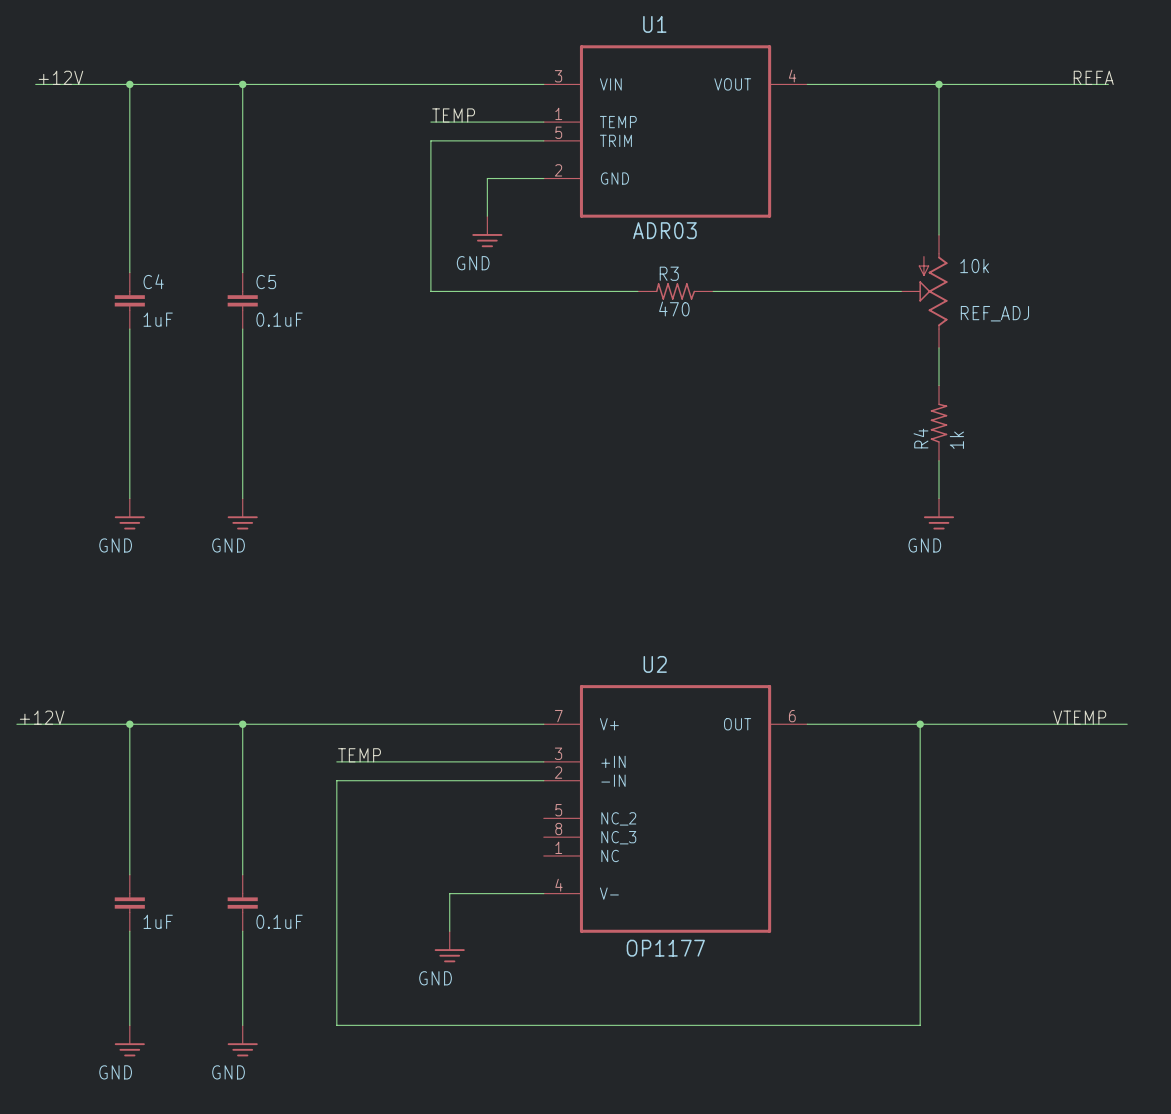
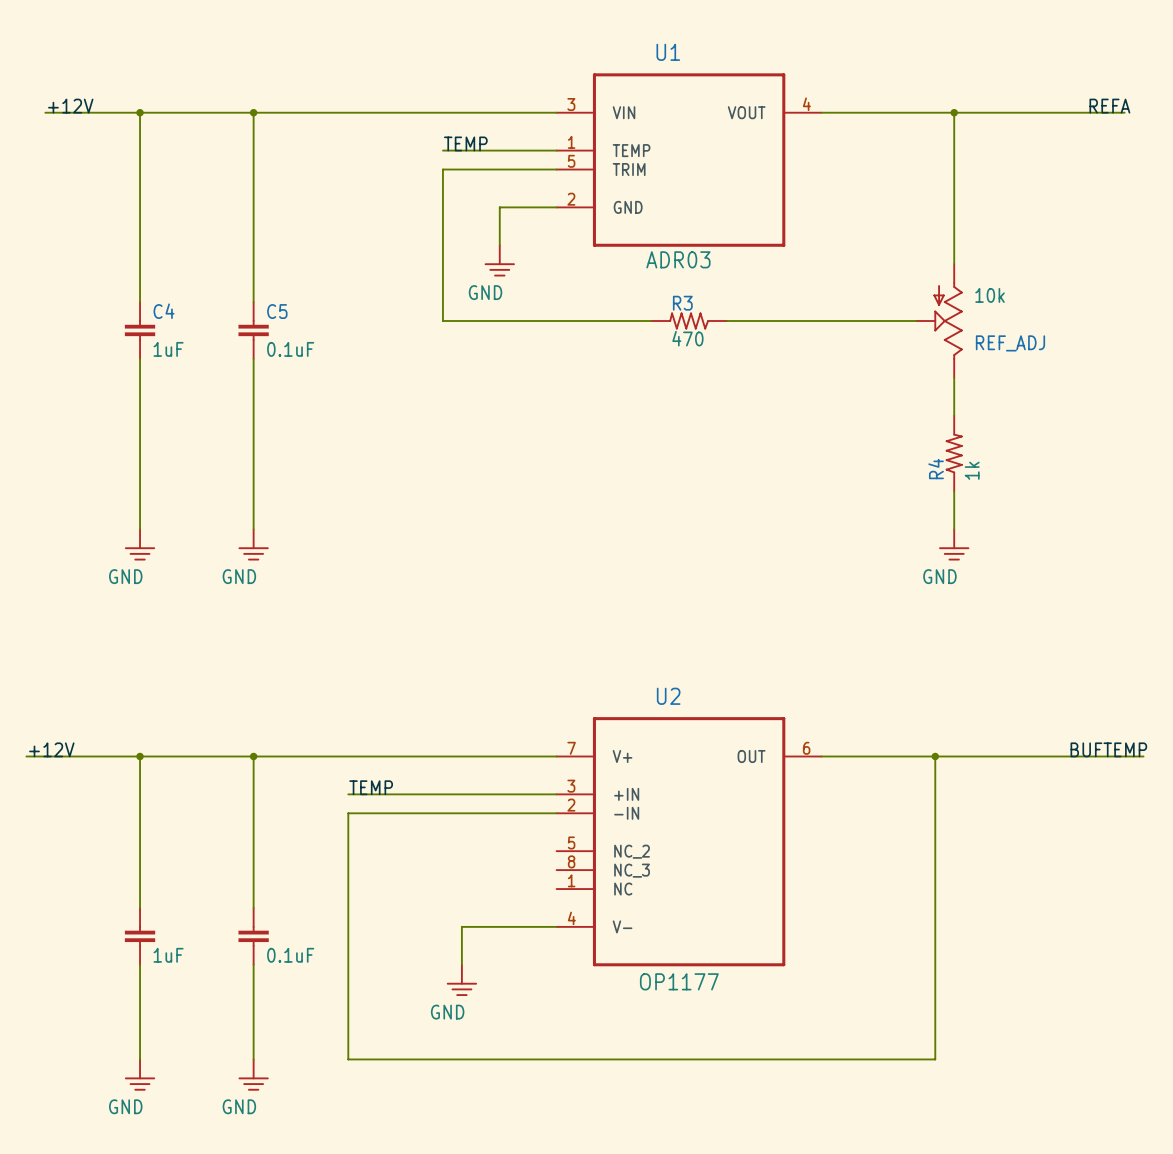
label: VTEMP (1079, 717) -> BUFTEMP (1108, 749)

